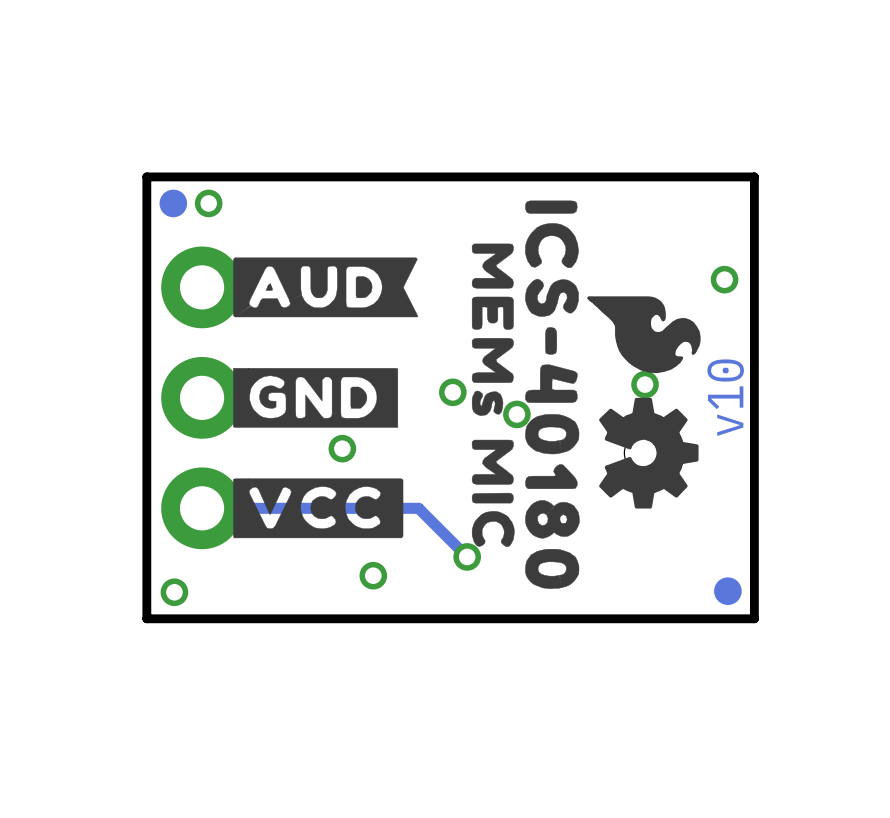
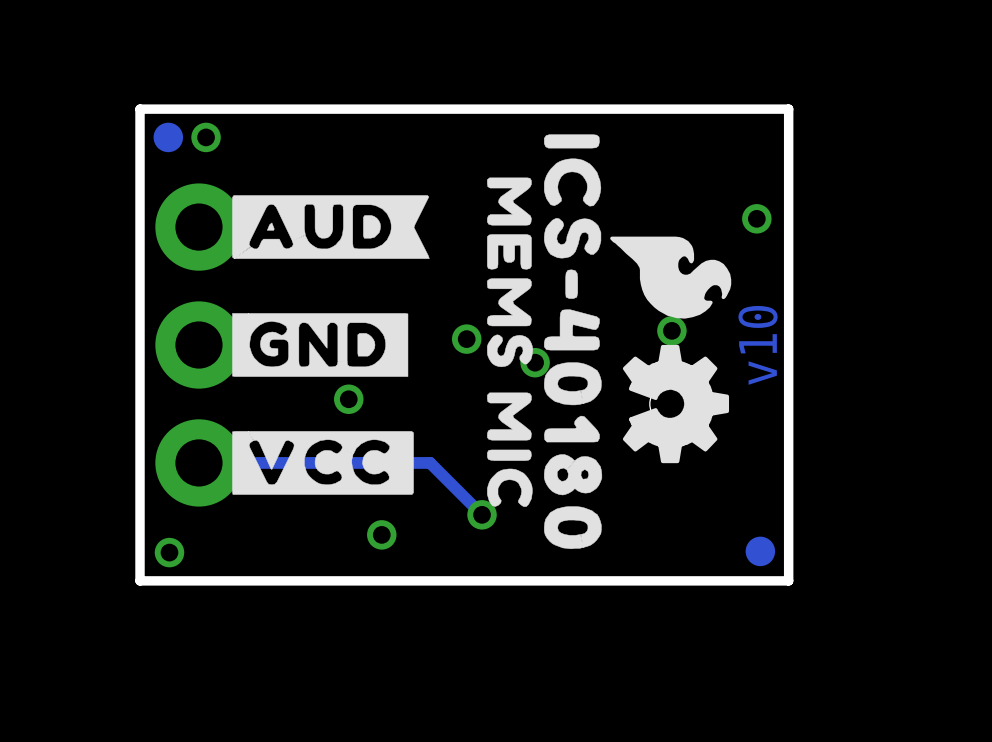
drawing shape: [471, 243, 515, 547] -> [487, 177, 534, 507]

